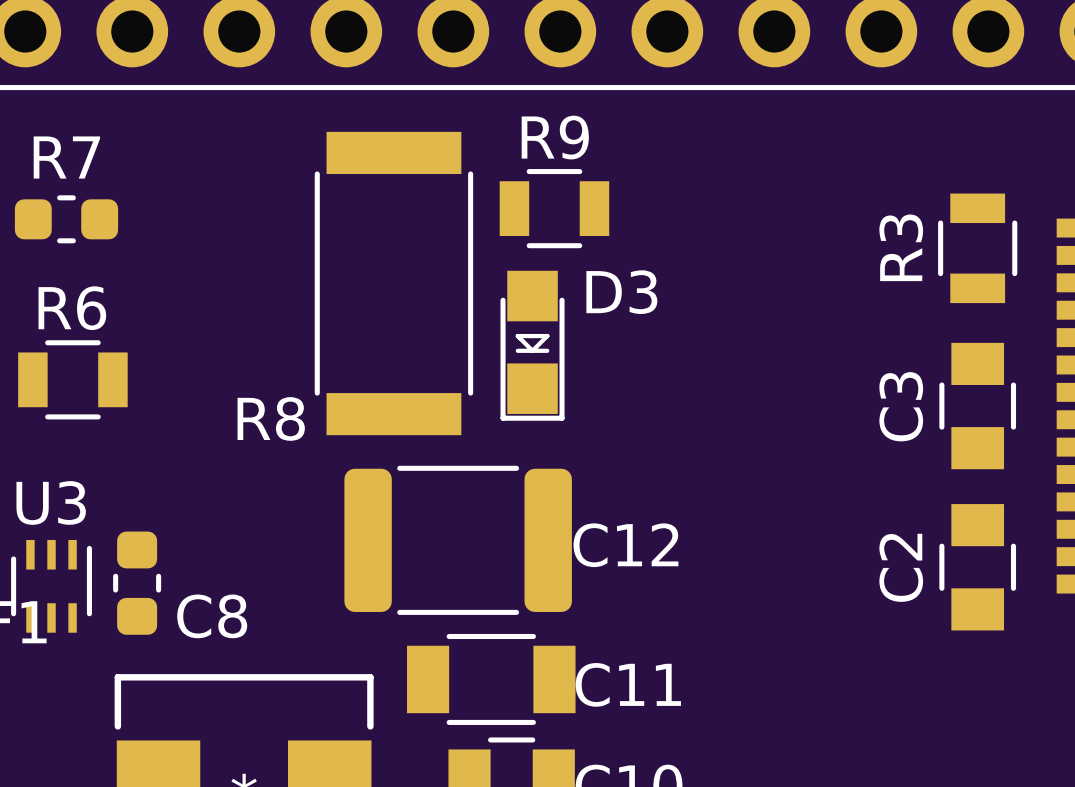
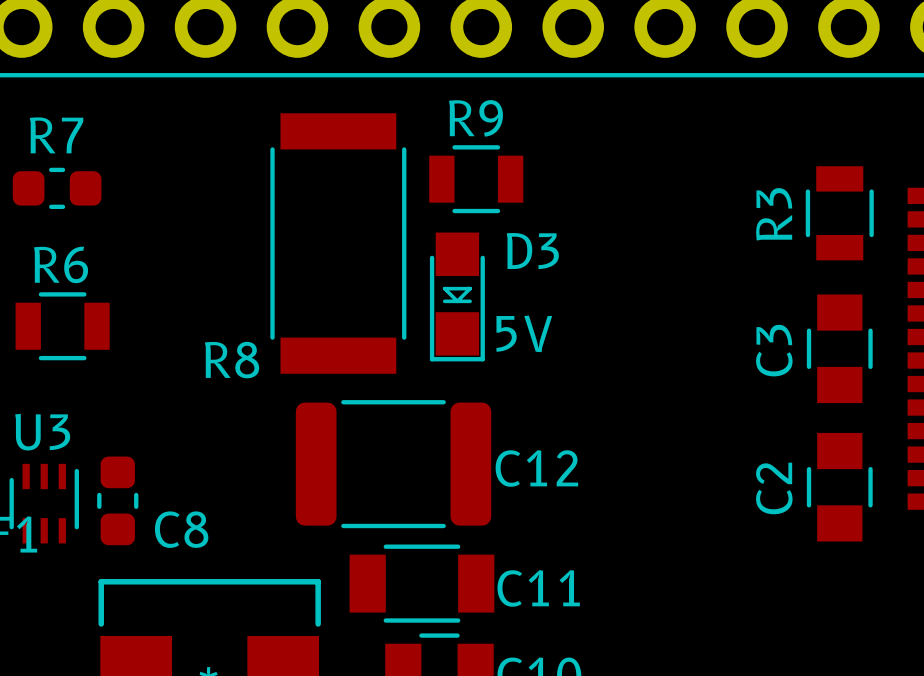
text: none -> 5V (524, 333)

